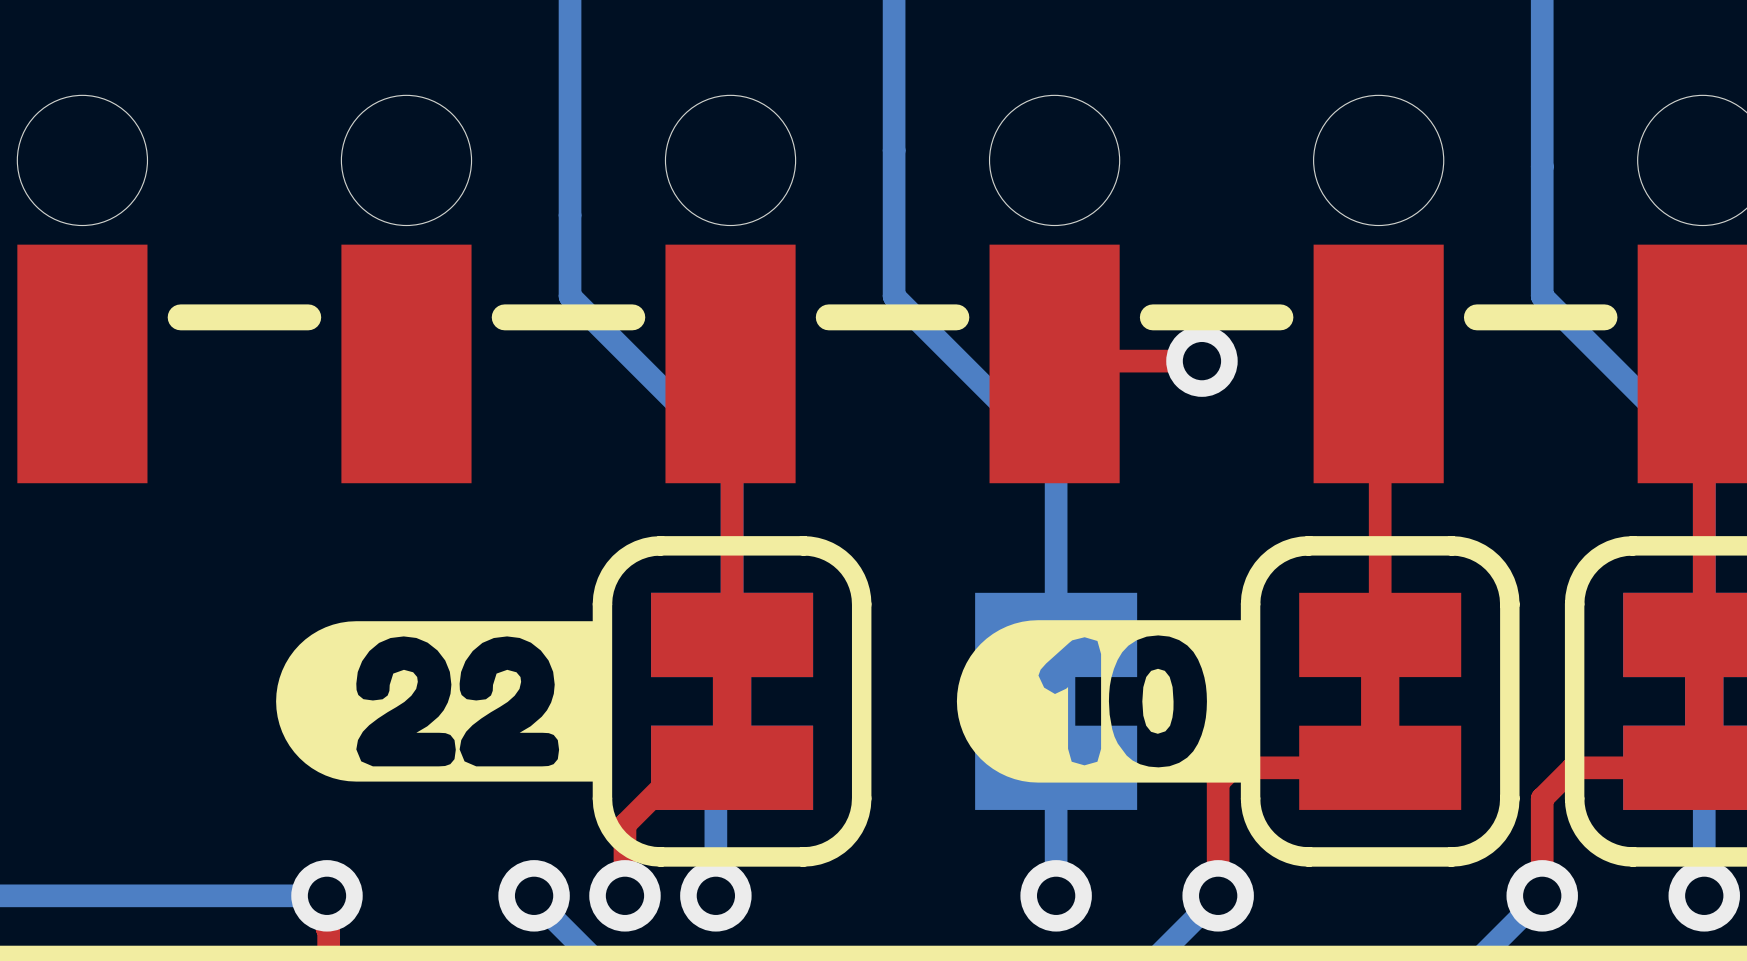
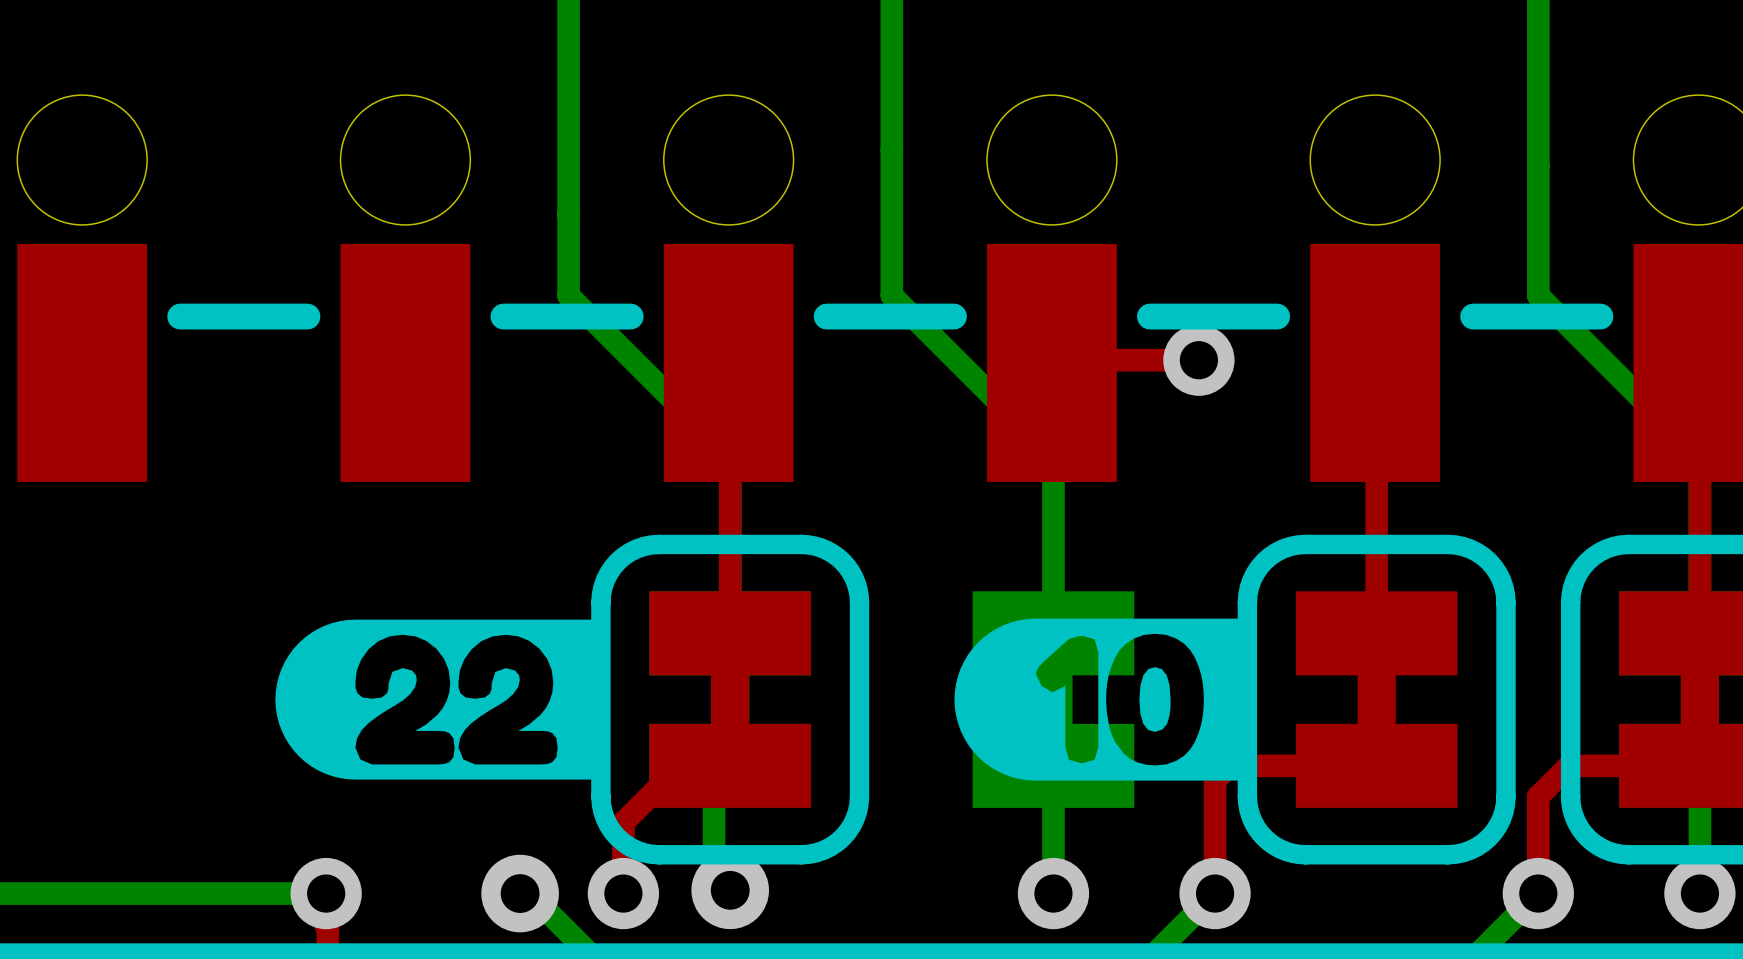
via size: [498, 860, 570, 932] -> [481, 854, 559, 933]
via position: (715, 895) -> (730, 890)

